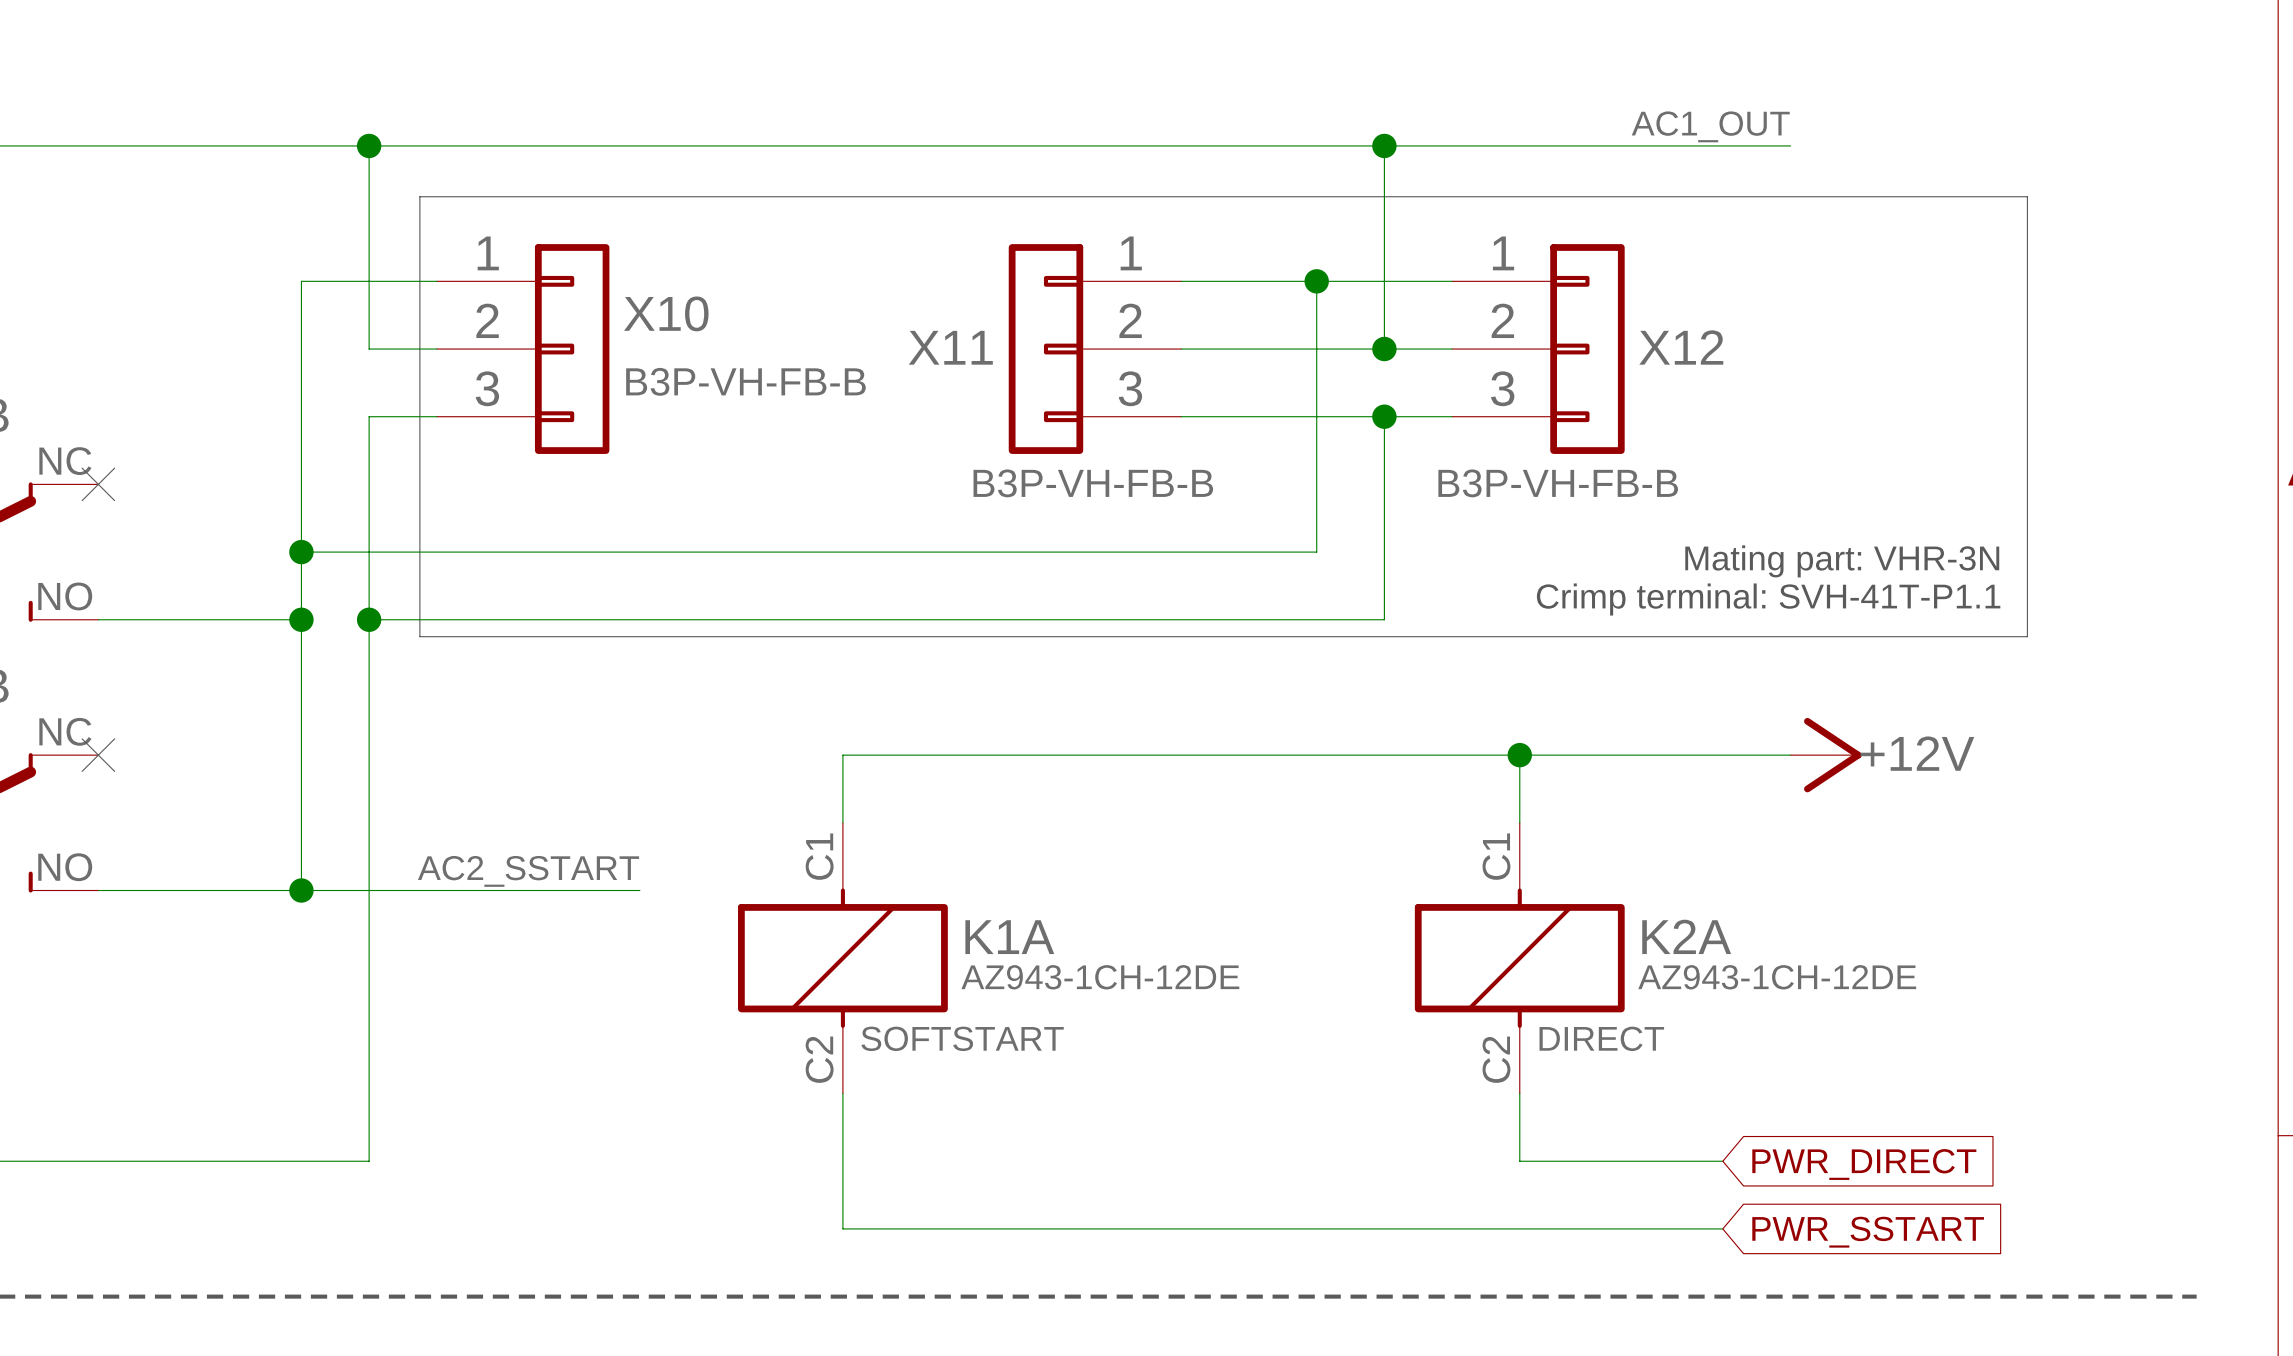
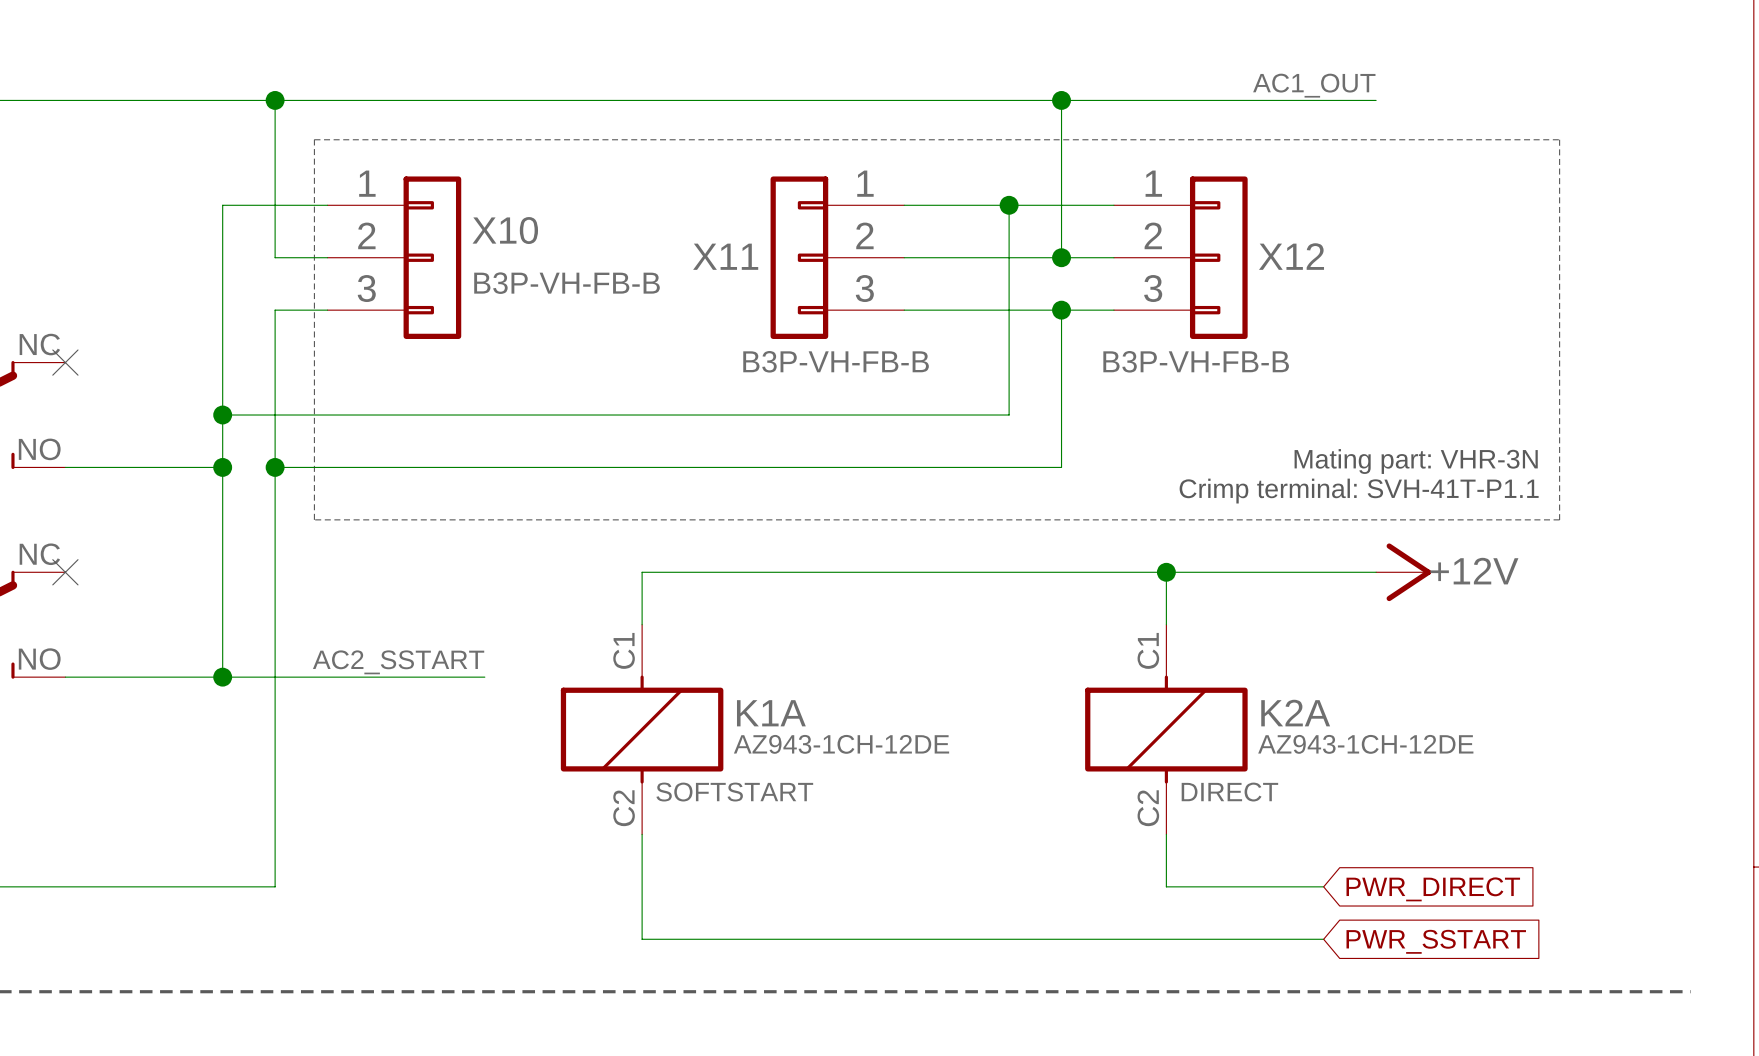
line: (419, 196) (2027, 196) (2027, 636) (419, 636) (419, 196) -> (314, 139) (314, 519) (1559, 519) (1559, 139) (314, 139)
text: Mating part: VHR-3N (1842, 561) -> none
text: Crimp terminal: SVH-41T-P1.1 (1768, 599) -> Mating part: VHR-3N (1416, 461)
text: none -> Crimp terminal: SVH-41T-P1.1 (1359, 491)

